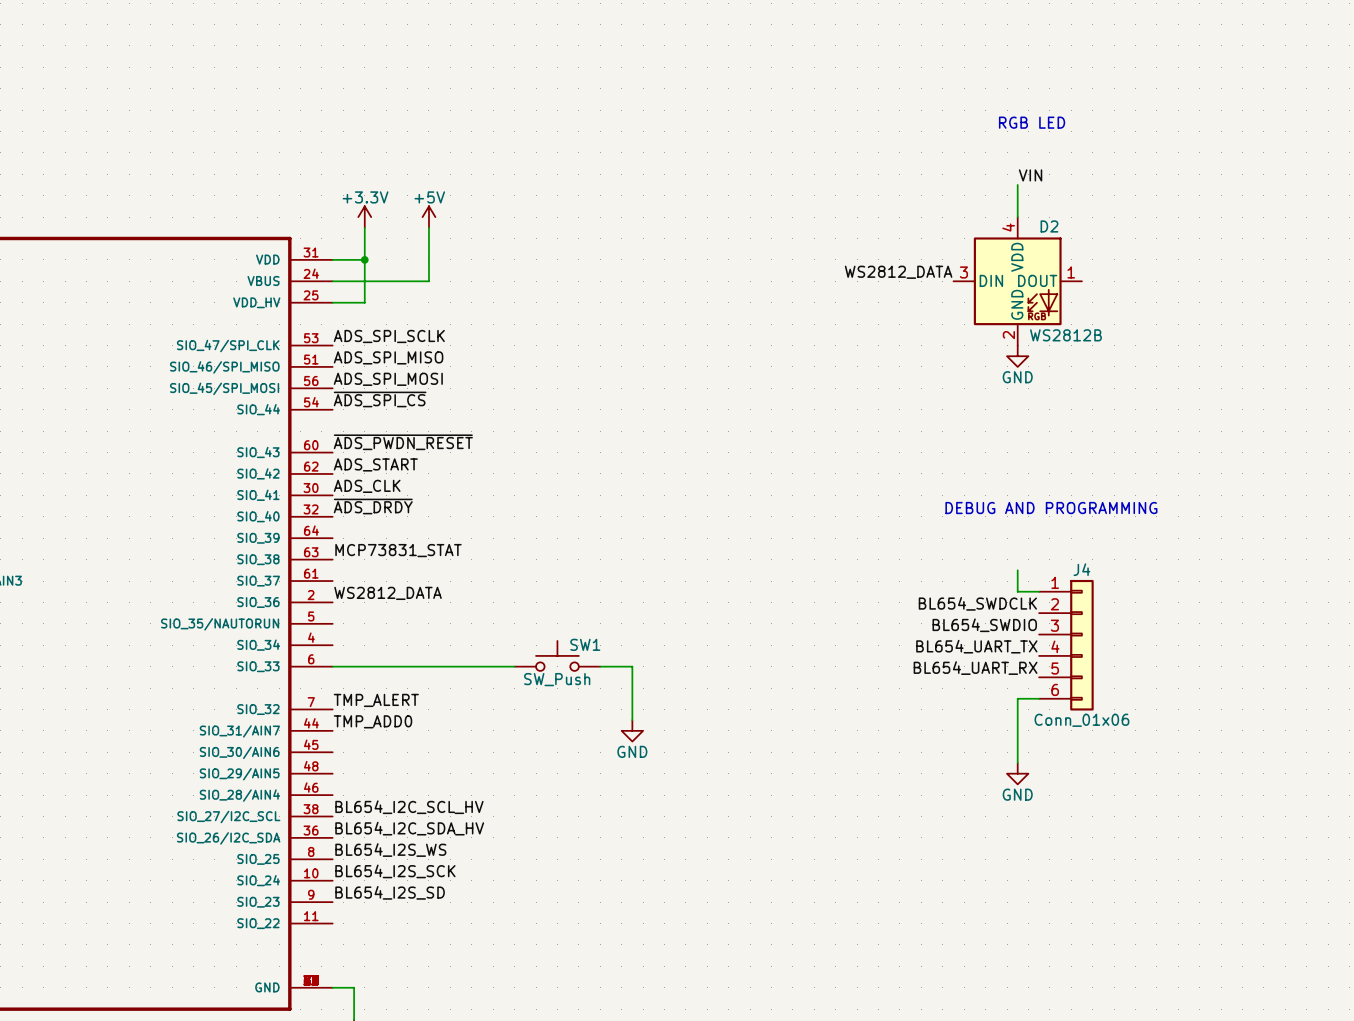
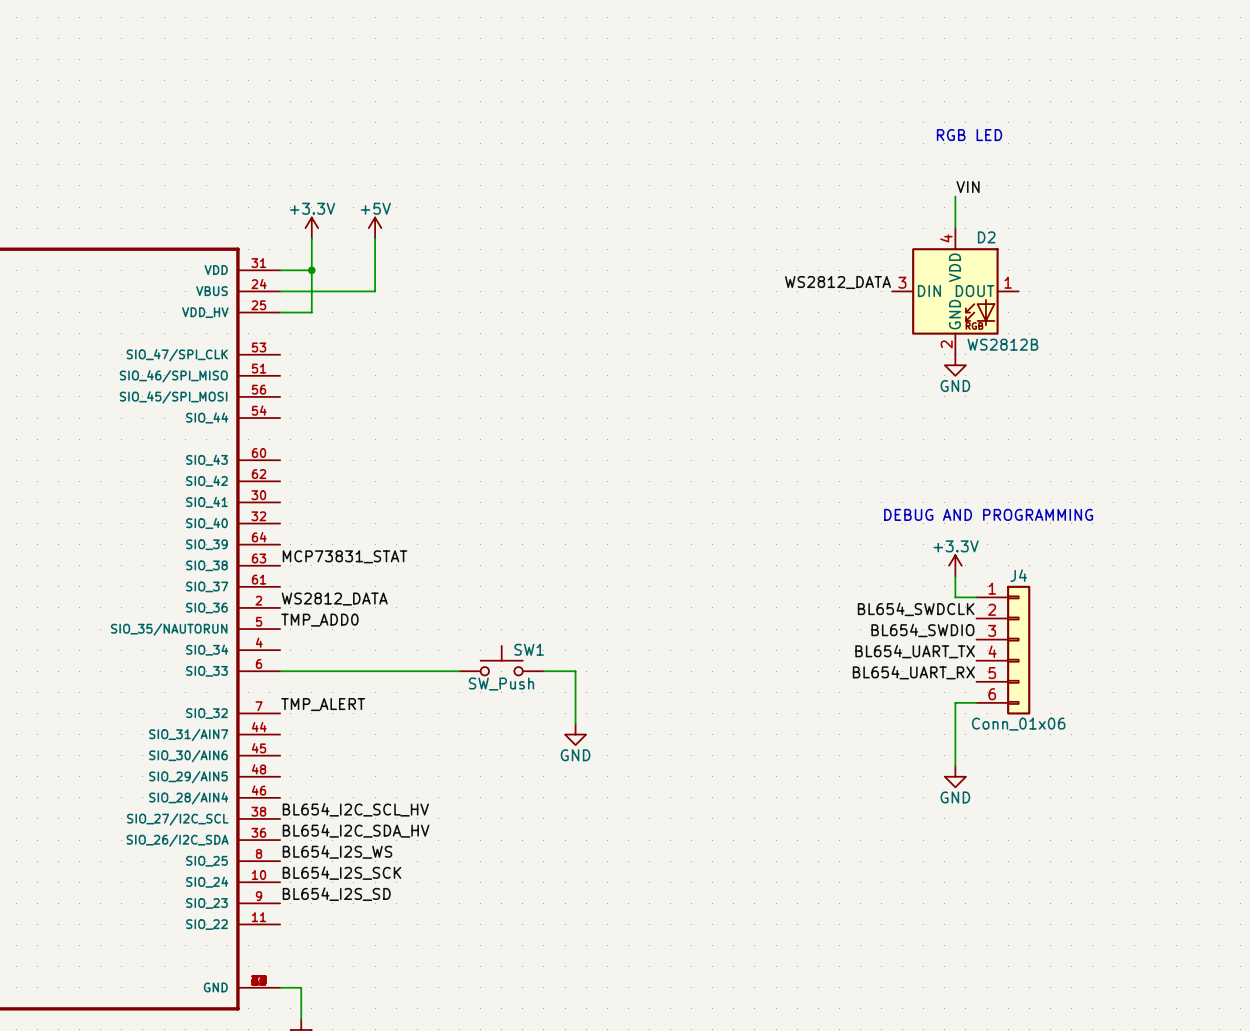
label: ADS_SPI_SCLK (389, 336) -> none
label: ADS_SPI_MISO (388, 357) -> none
label: ADS_SPI_MOSI (388, 379) -> none
label: ~{ADS_SPI_CS} (380, 399) -> none
label: ~{ADS_PWDN_RESET} (403, 442) -> none
label: ADS_START (375, 464) -> none
label: ADS_CLK (367, 486) -> none
label: ~{ADS_DRDY} (373, 506) -> none
power symbol: none -> +3.3V (955, 565)
label position: TMP_ADD0 (373, 721) -> TMP_ADD0 (319, 620)

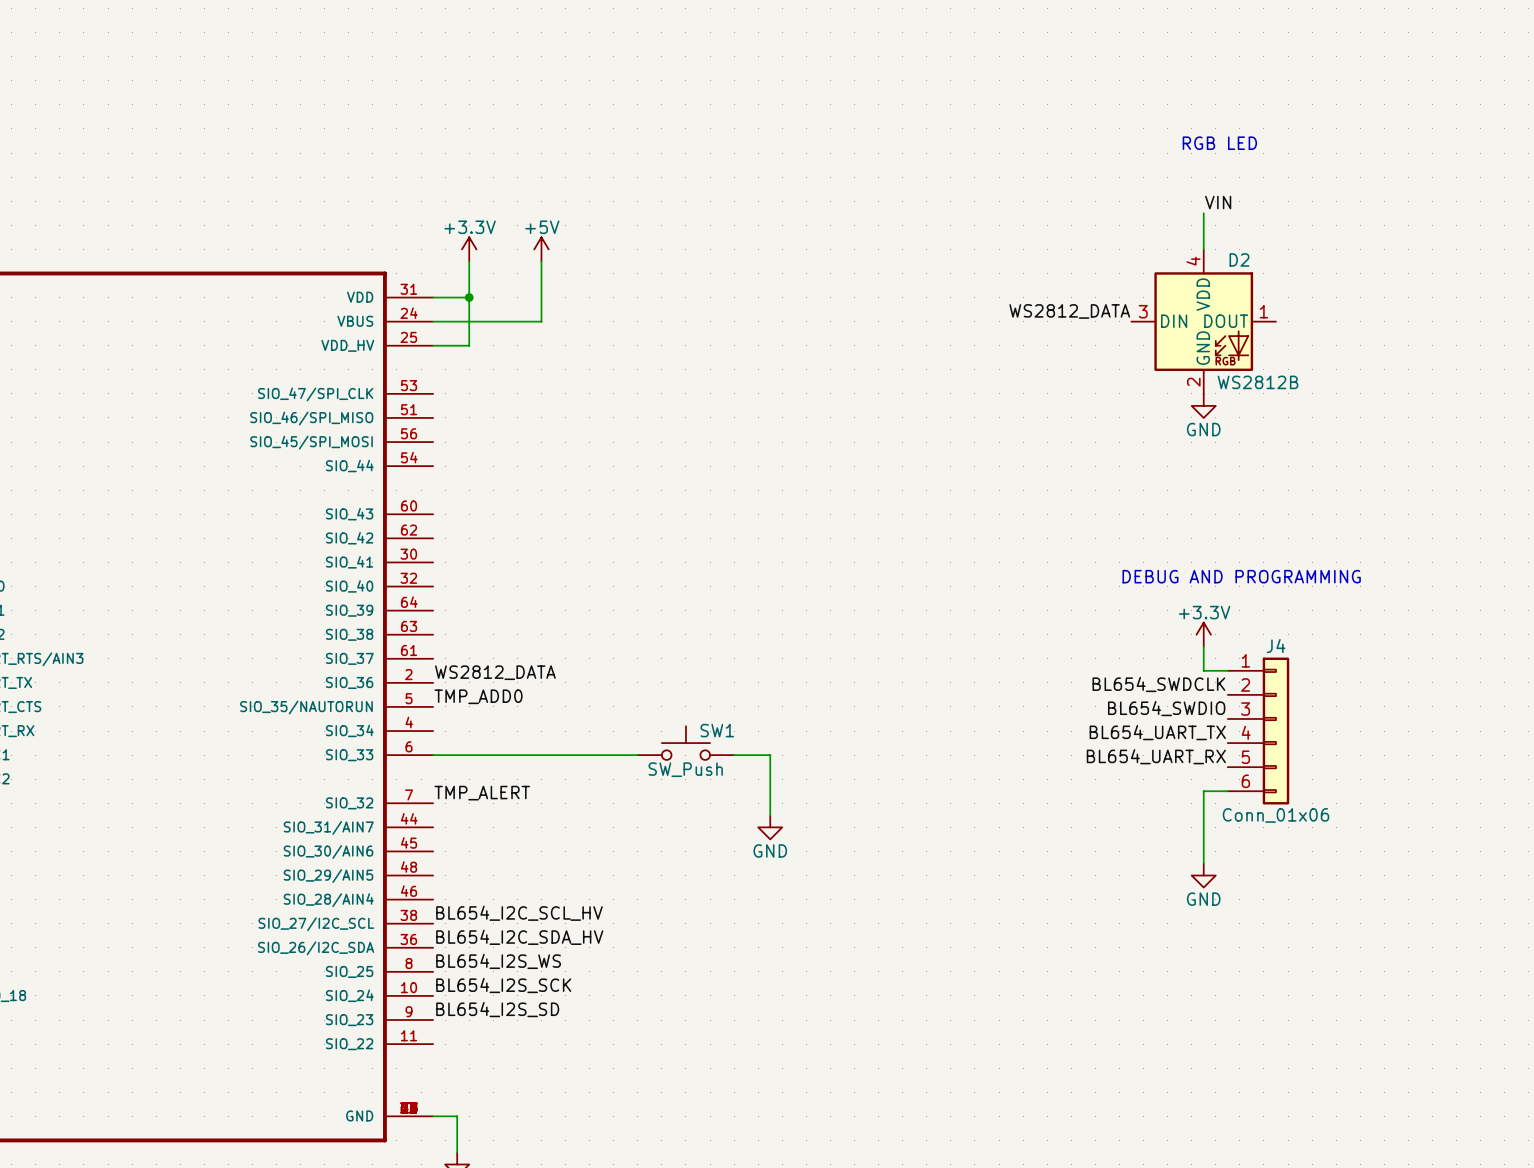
label: MCP73831_STAT (345, 556) -> none

